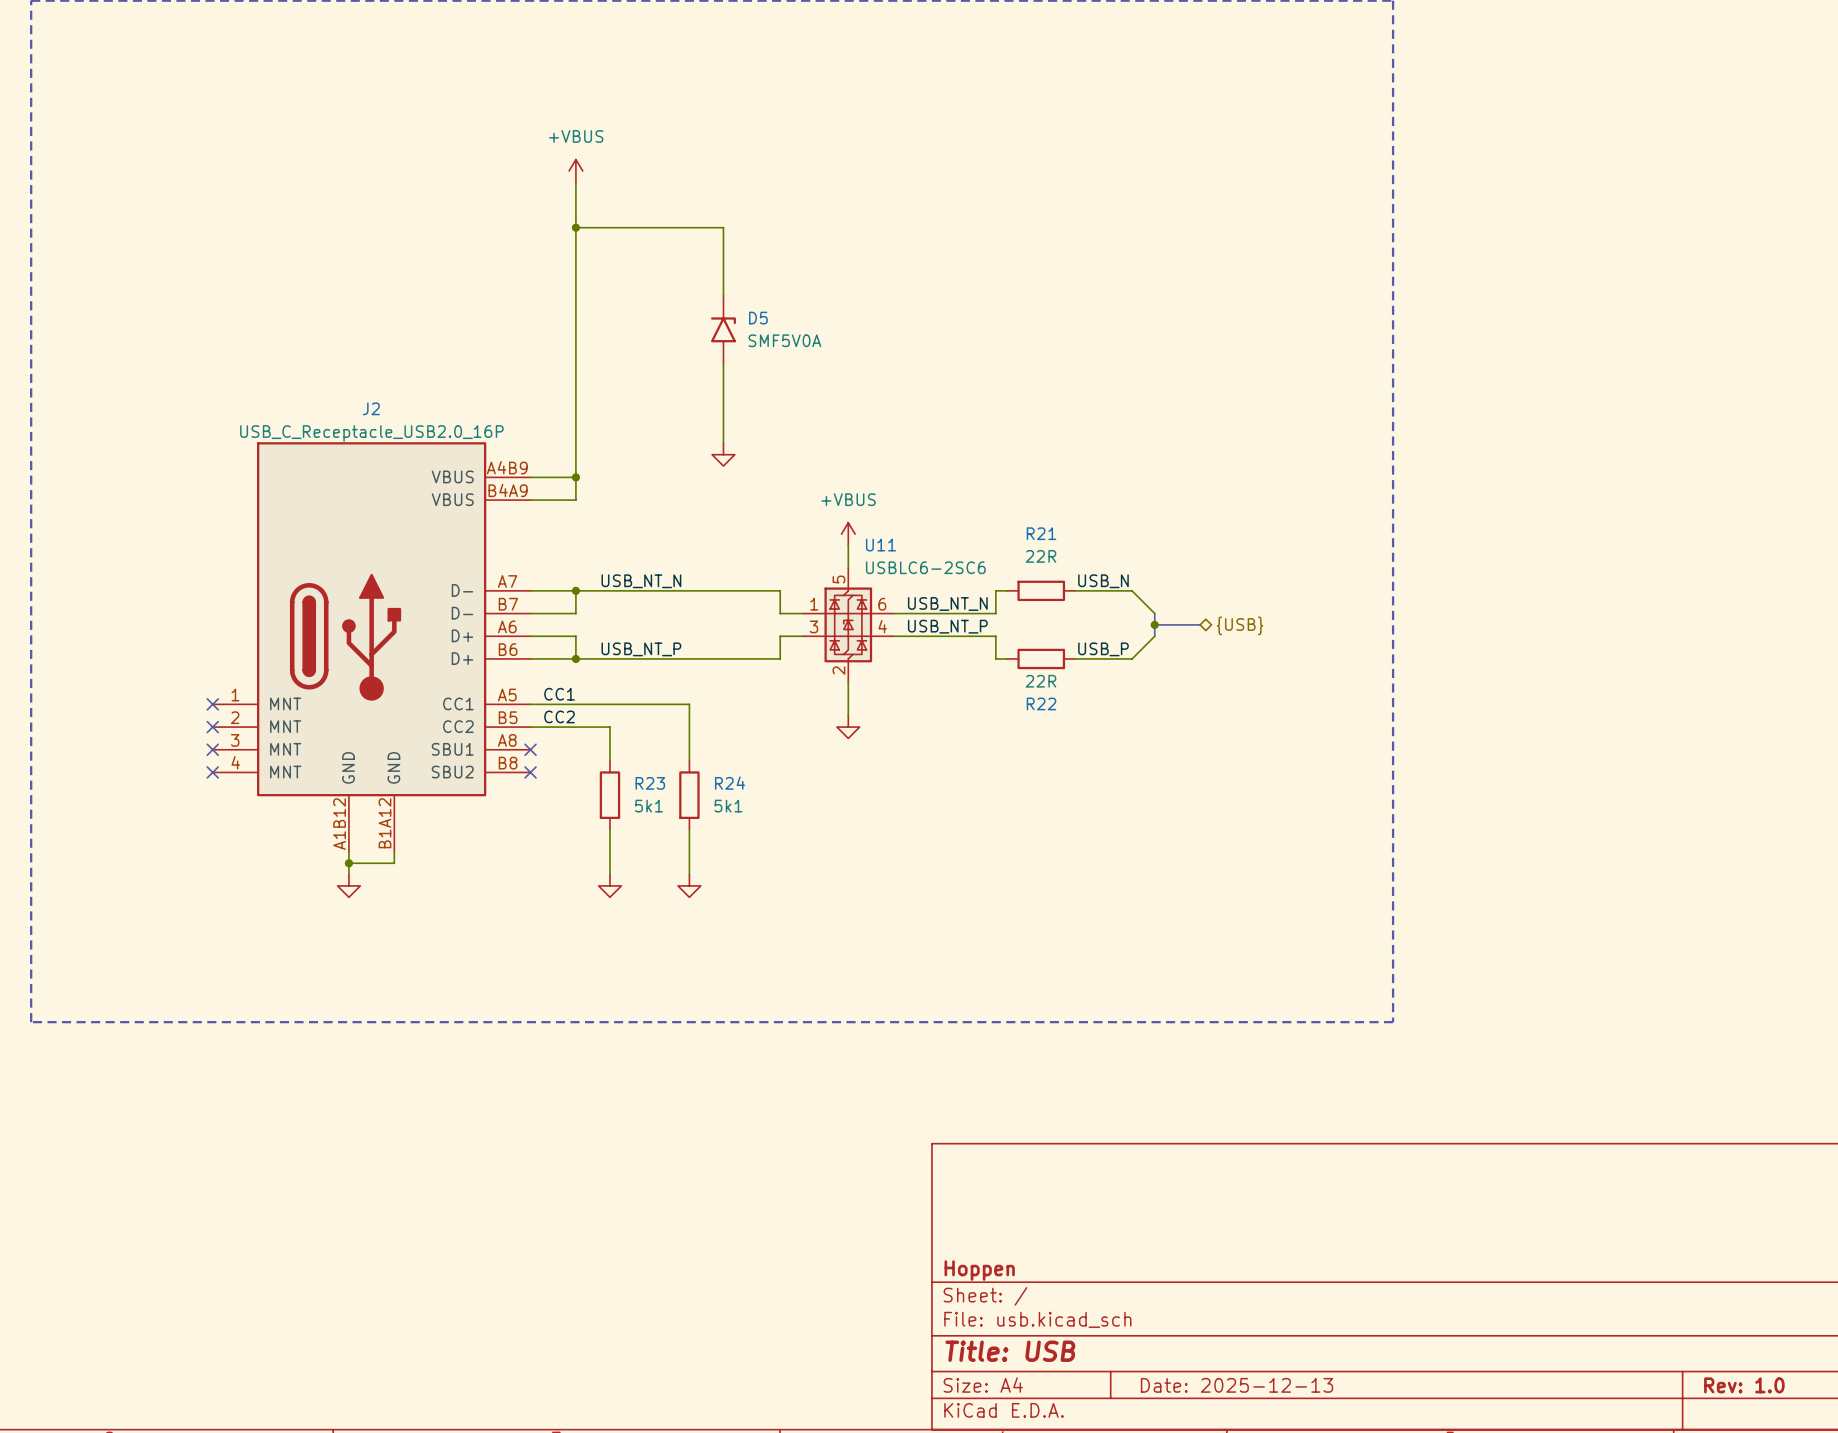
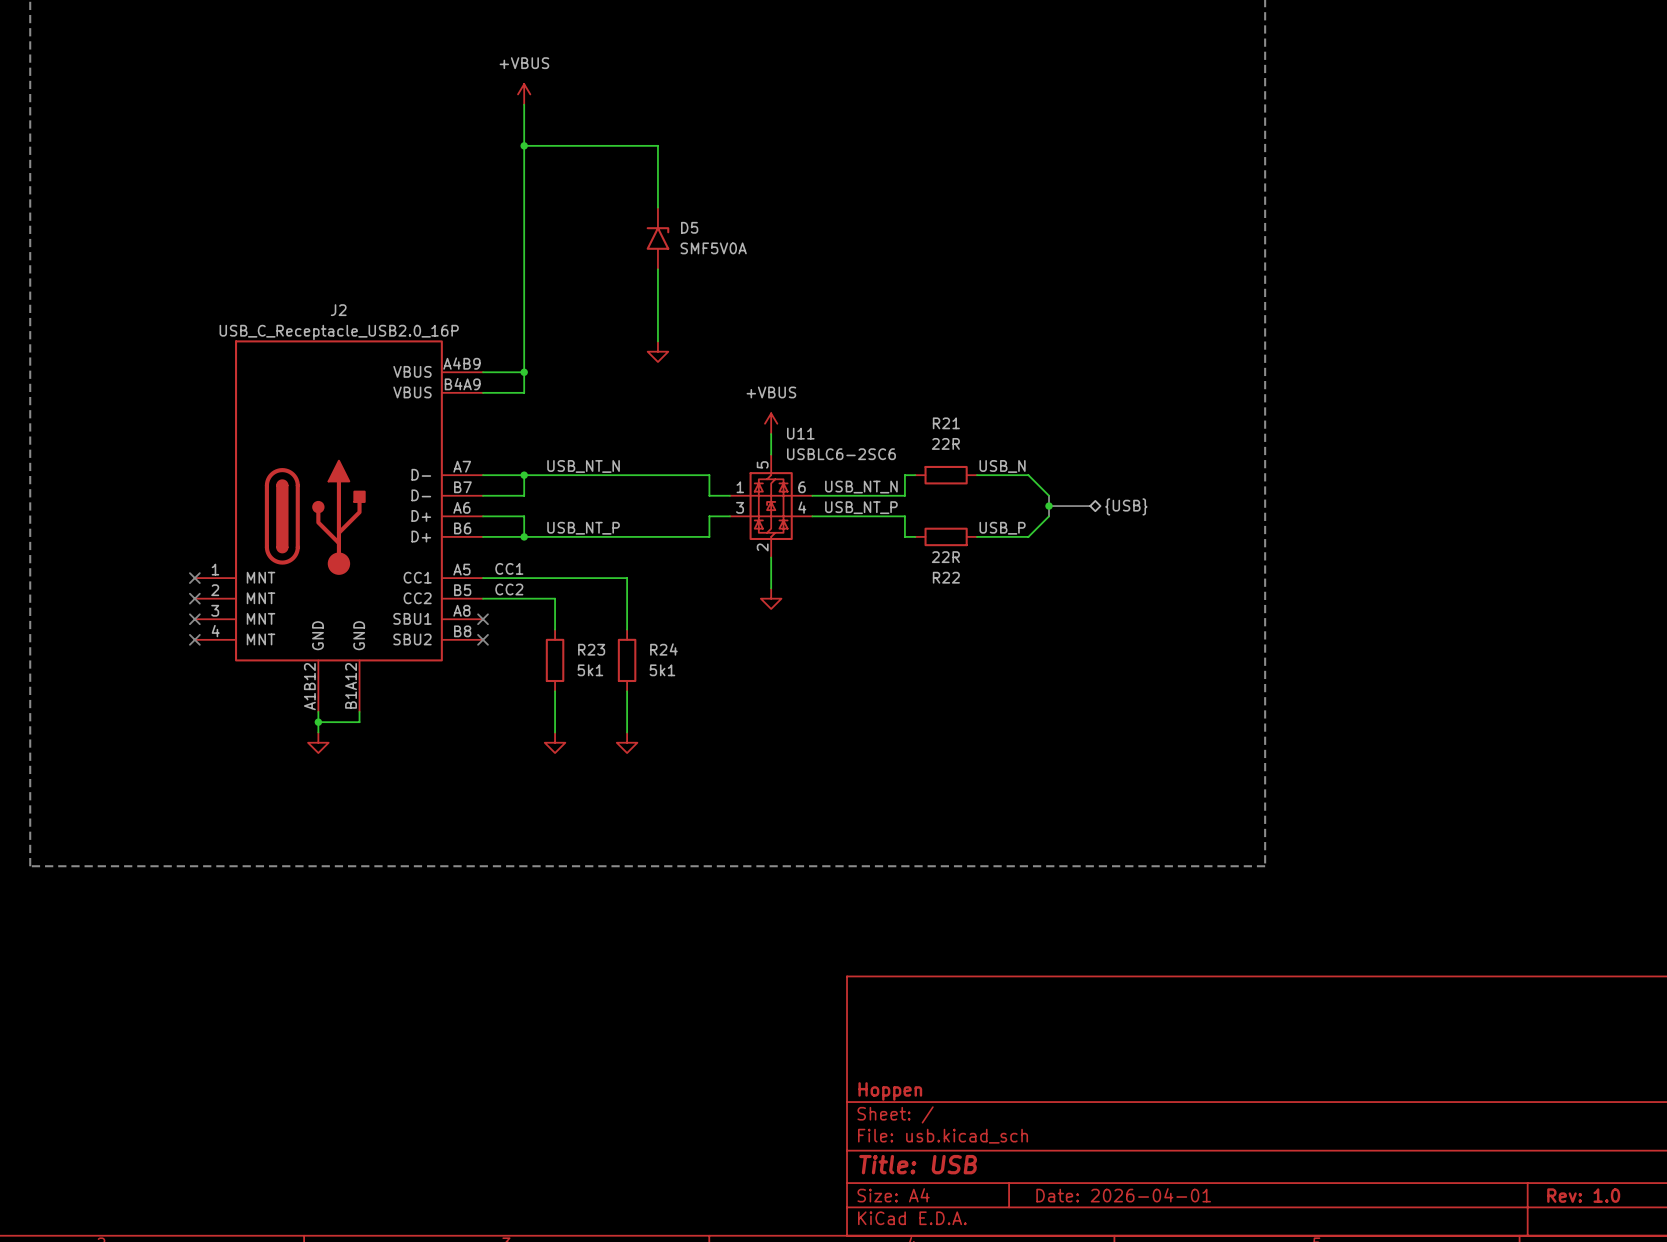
title block: Date: 2025-12-13 (1237, 1385) -> Date: 2026-04-01 (1123, 1195)

